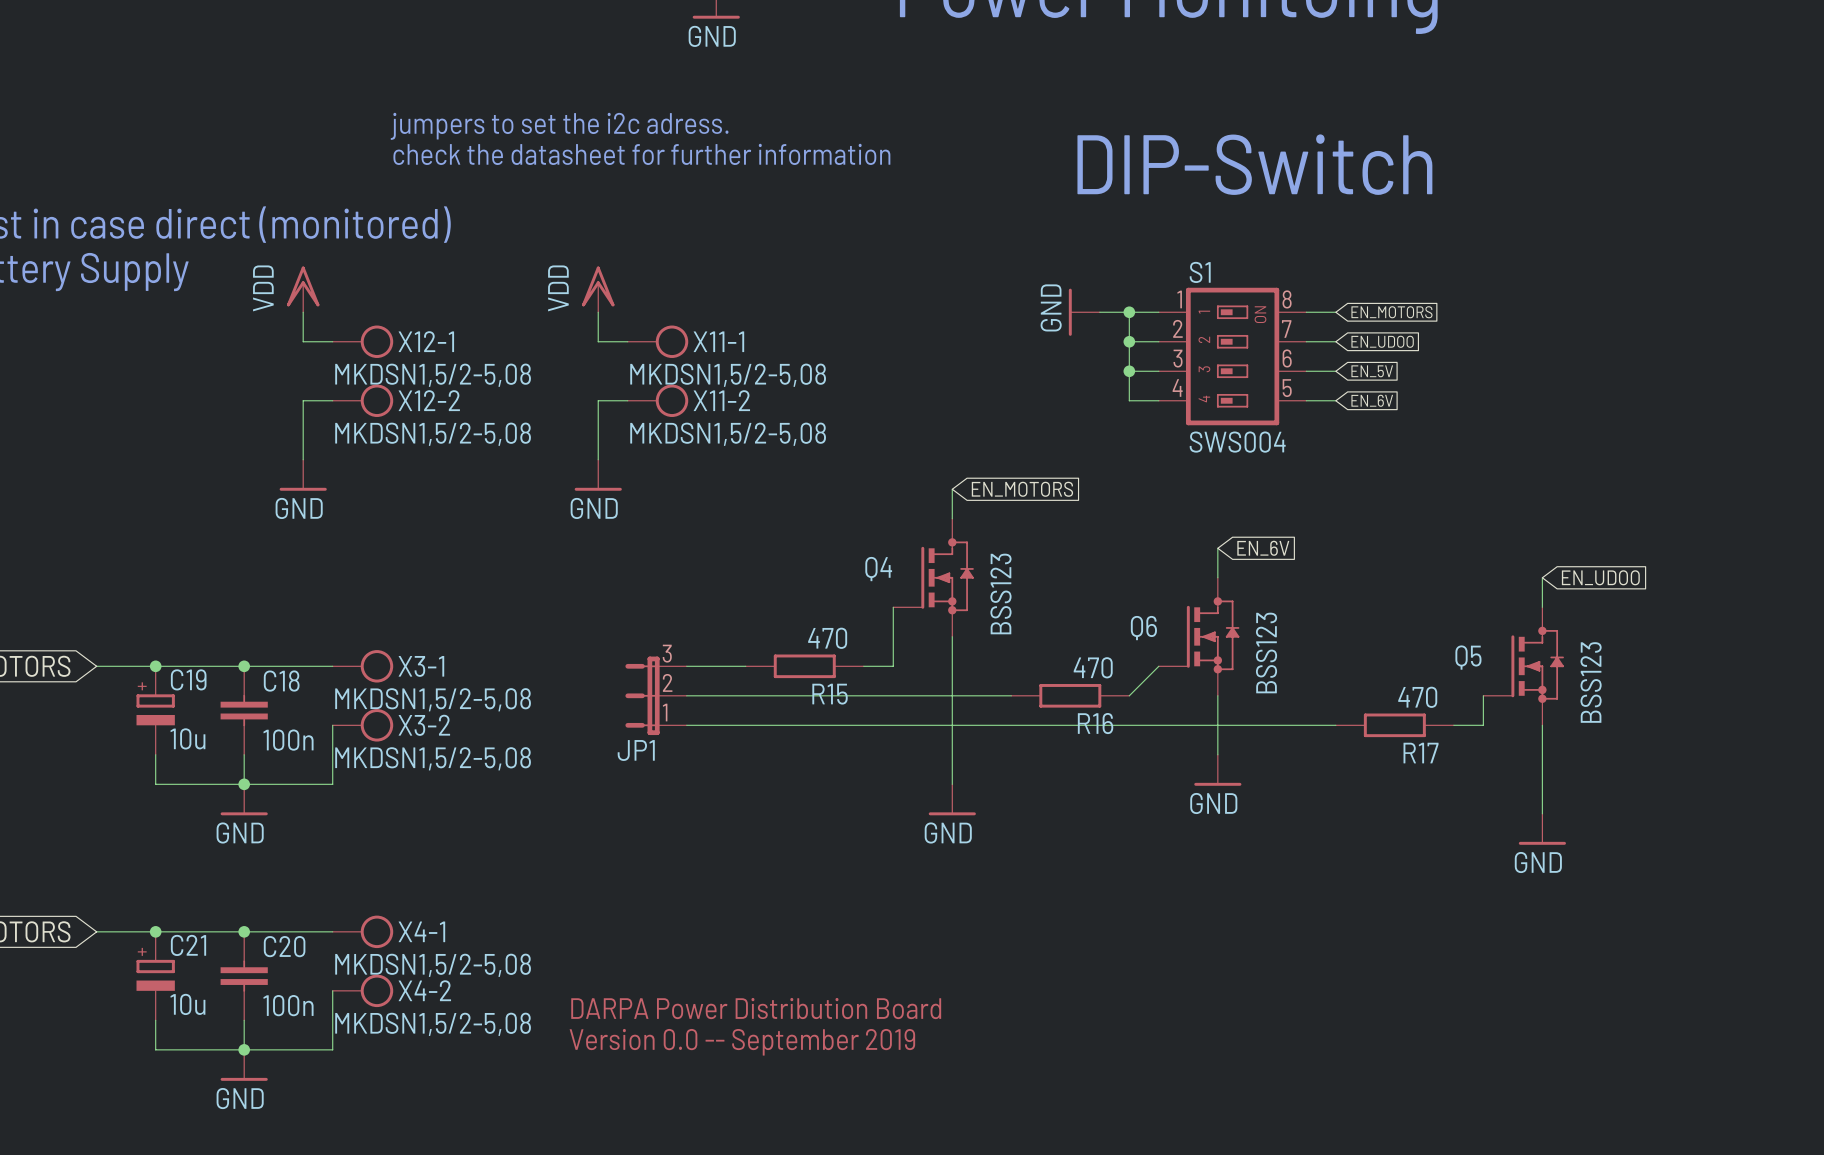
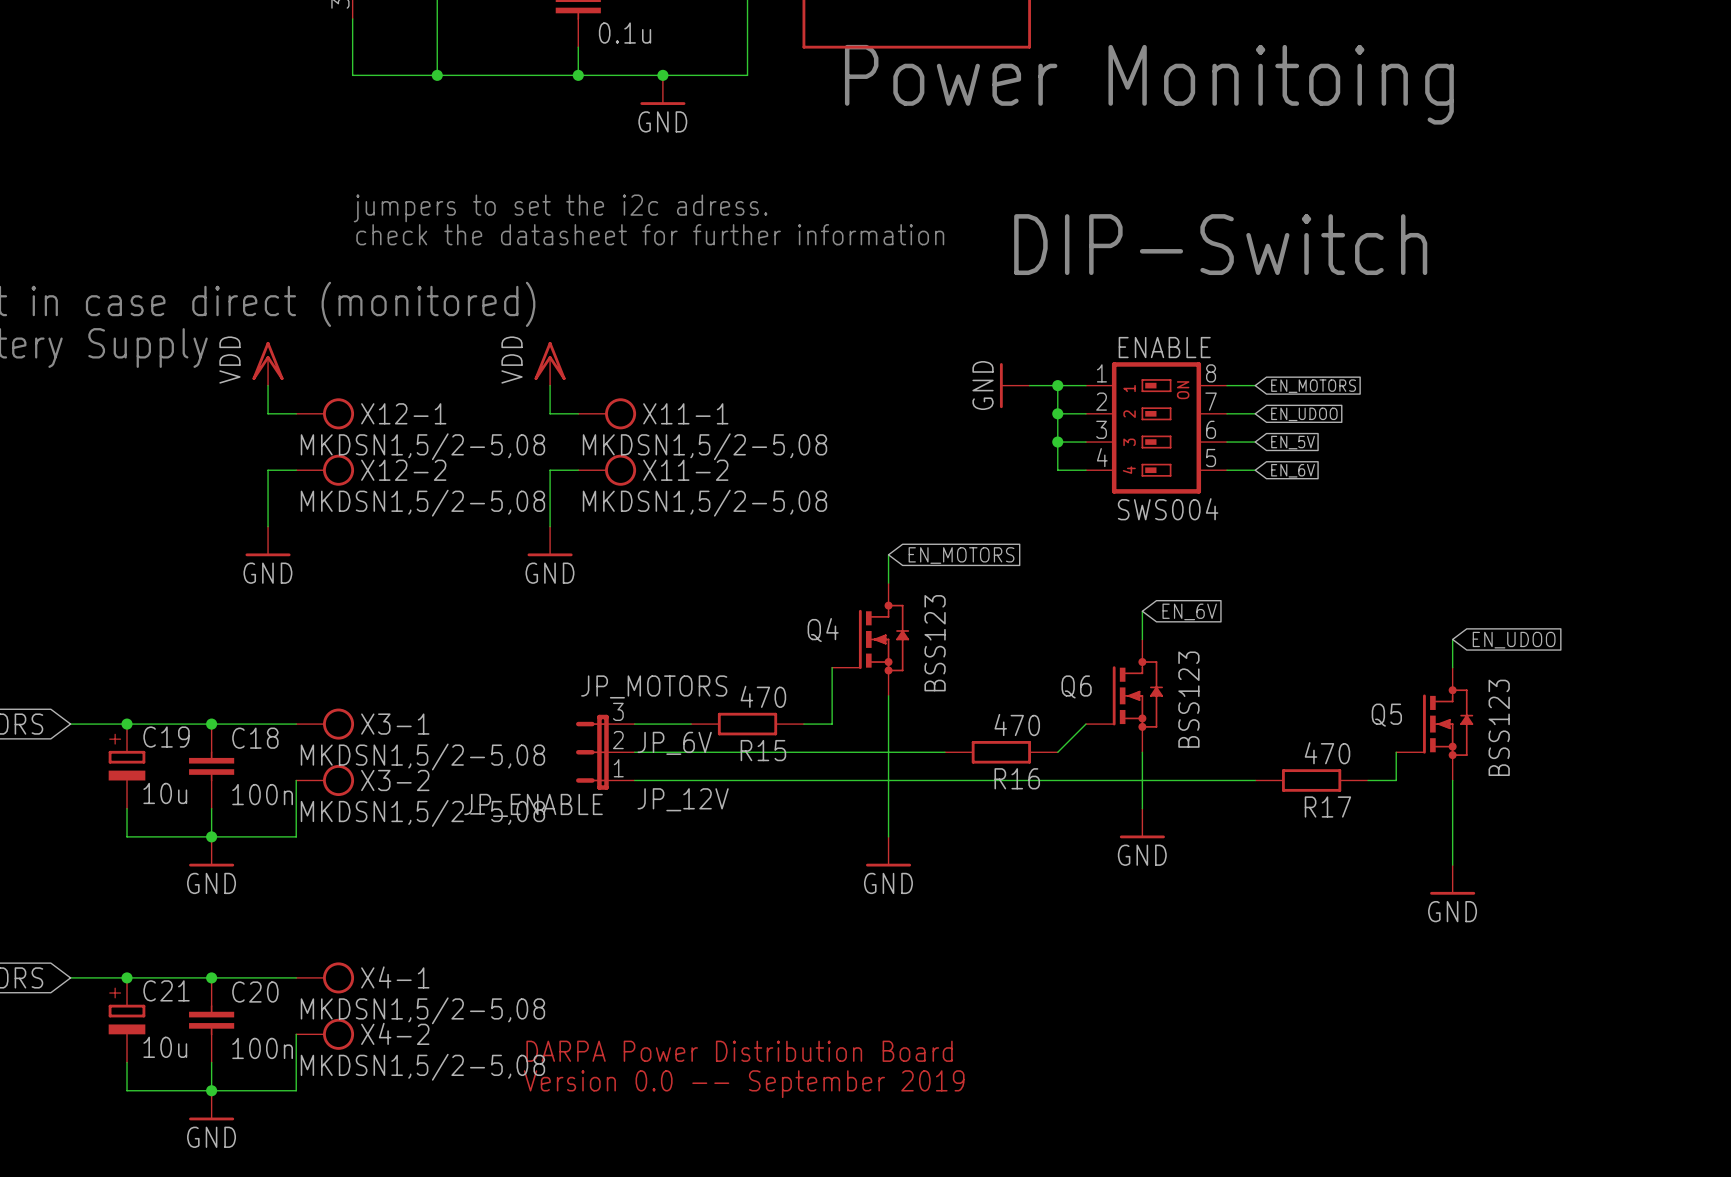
S1 name: S1 (1200, 272) -> ENABLE (1164, 347)
label: none -> JP_MOTORS (654, 686)
label: none -> JP_6V (674, 743)
label: none -> JP_12V (683, 799)
JP1 name: JP1 (636, 750) -> JP_ENABLE (533, 805)

